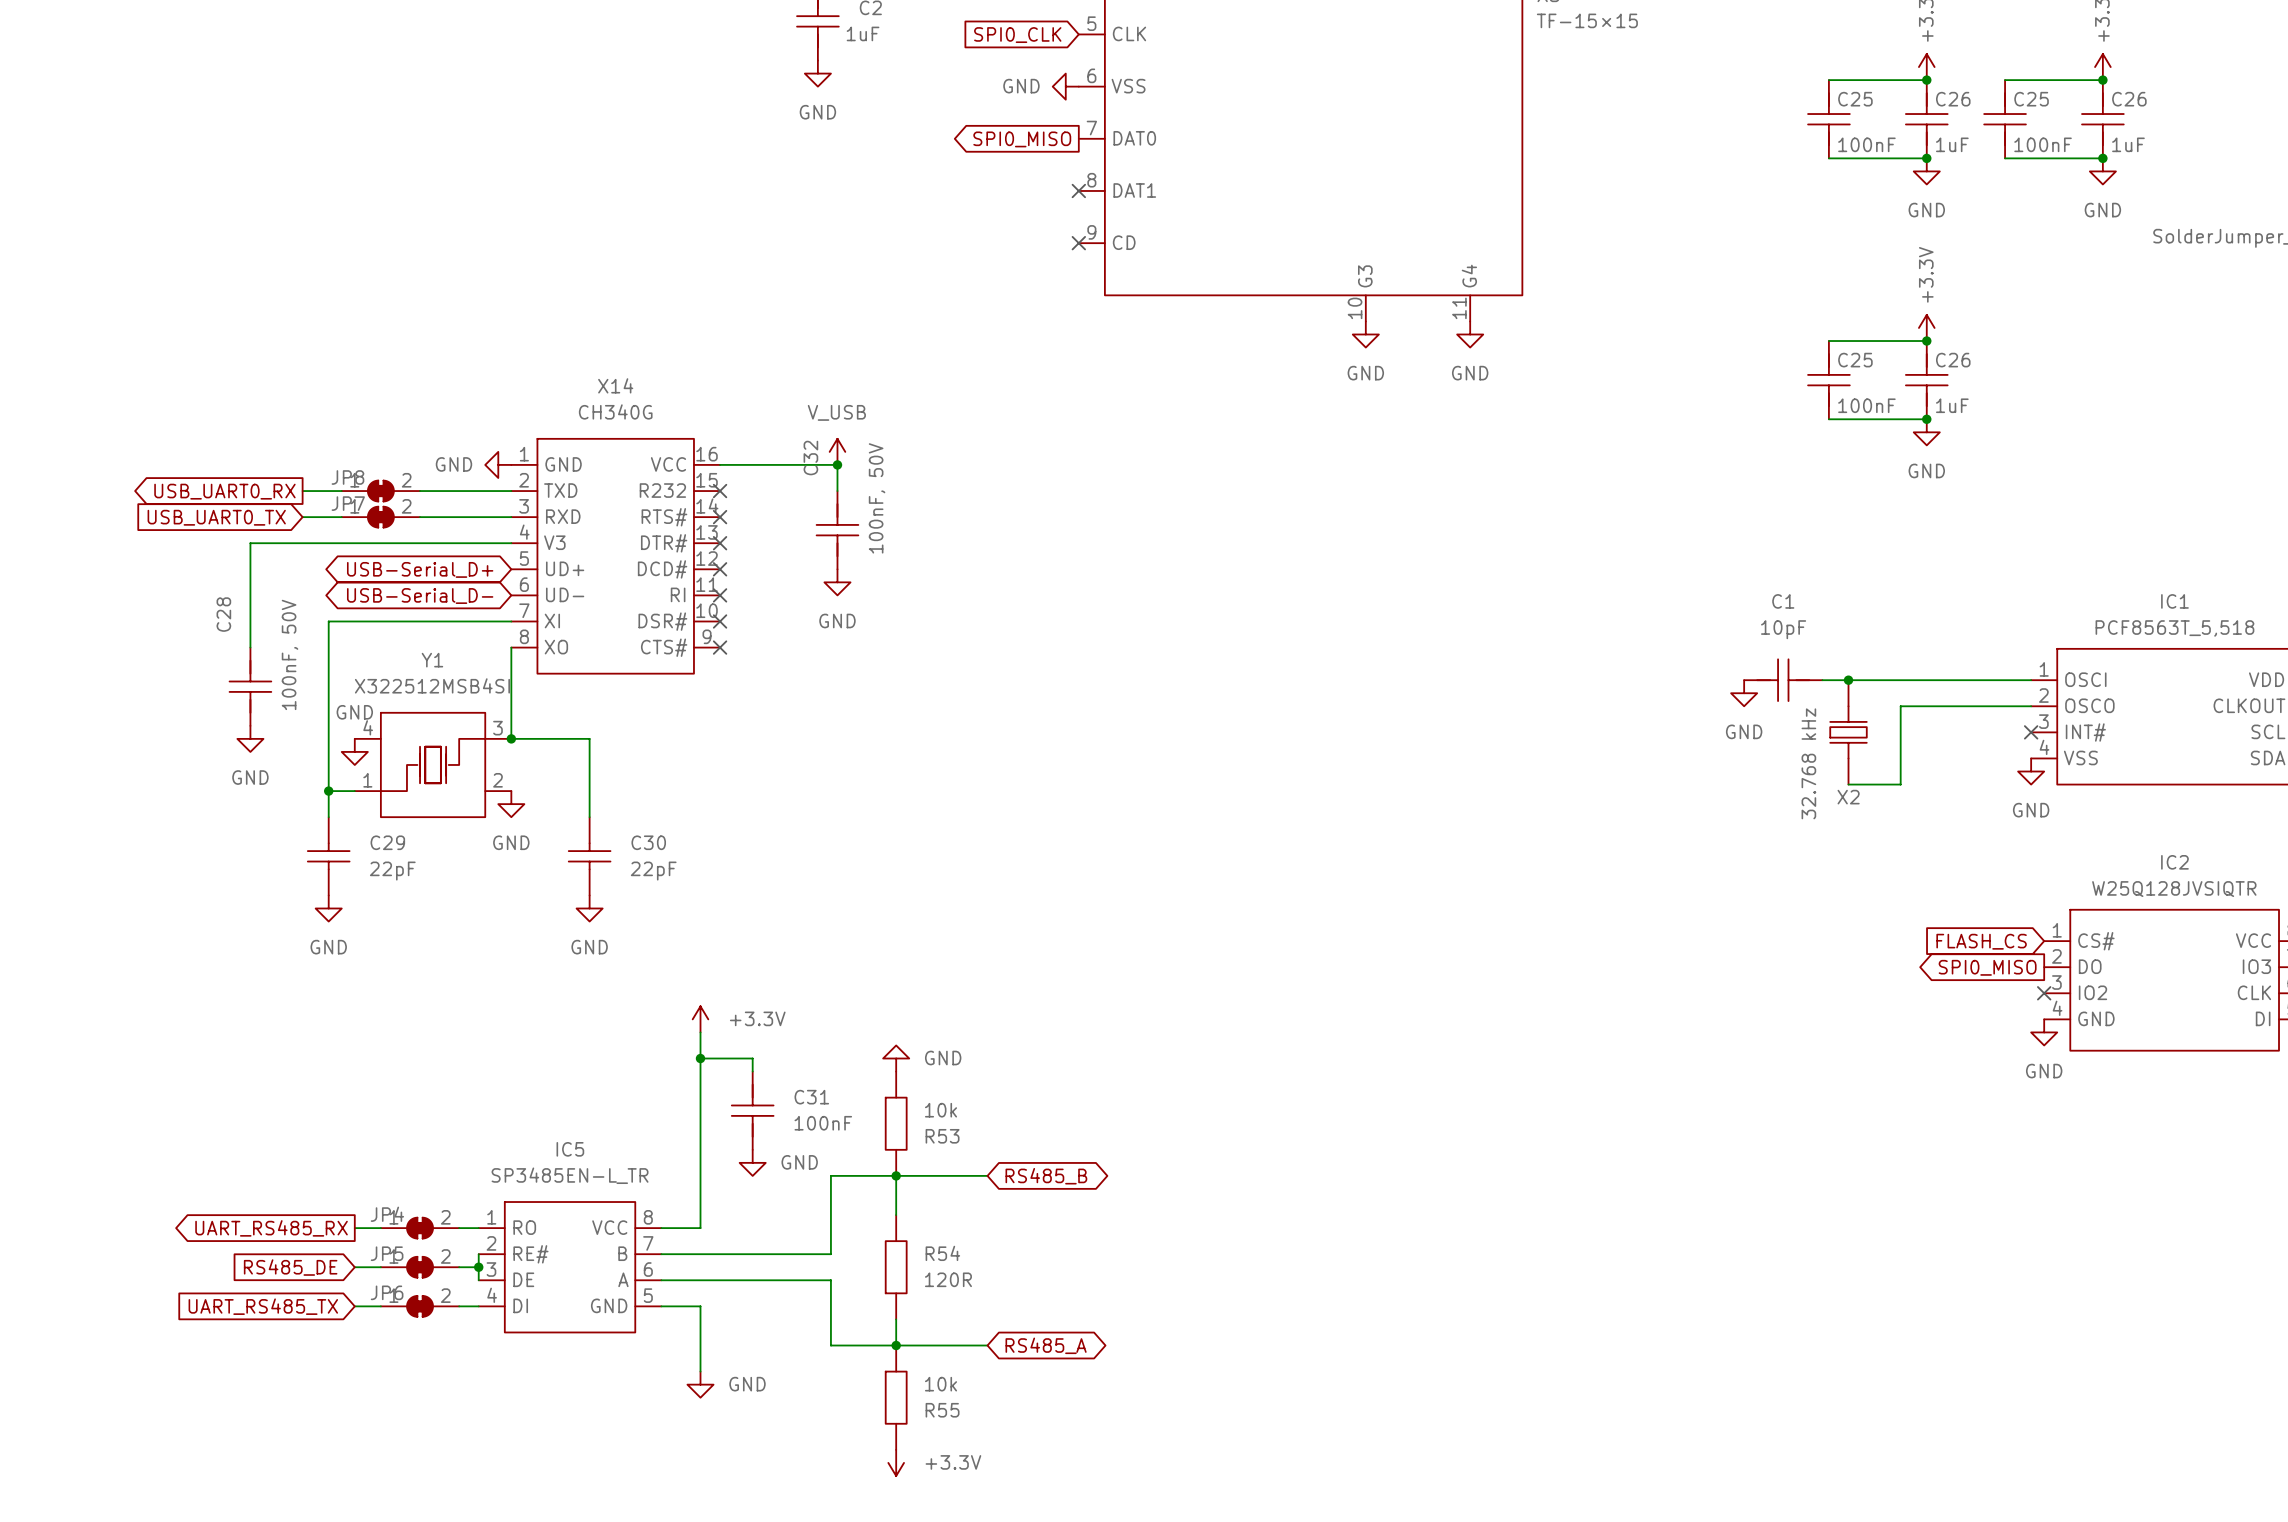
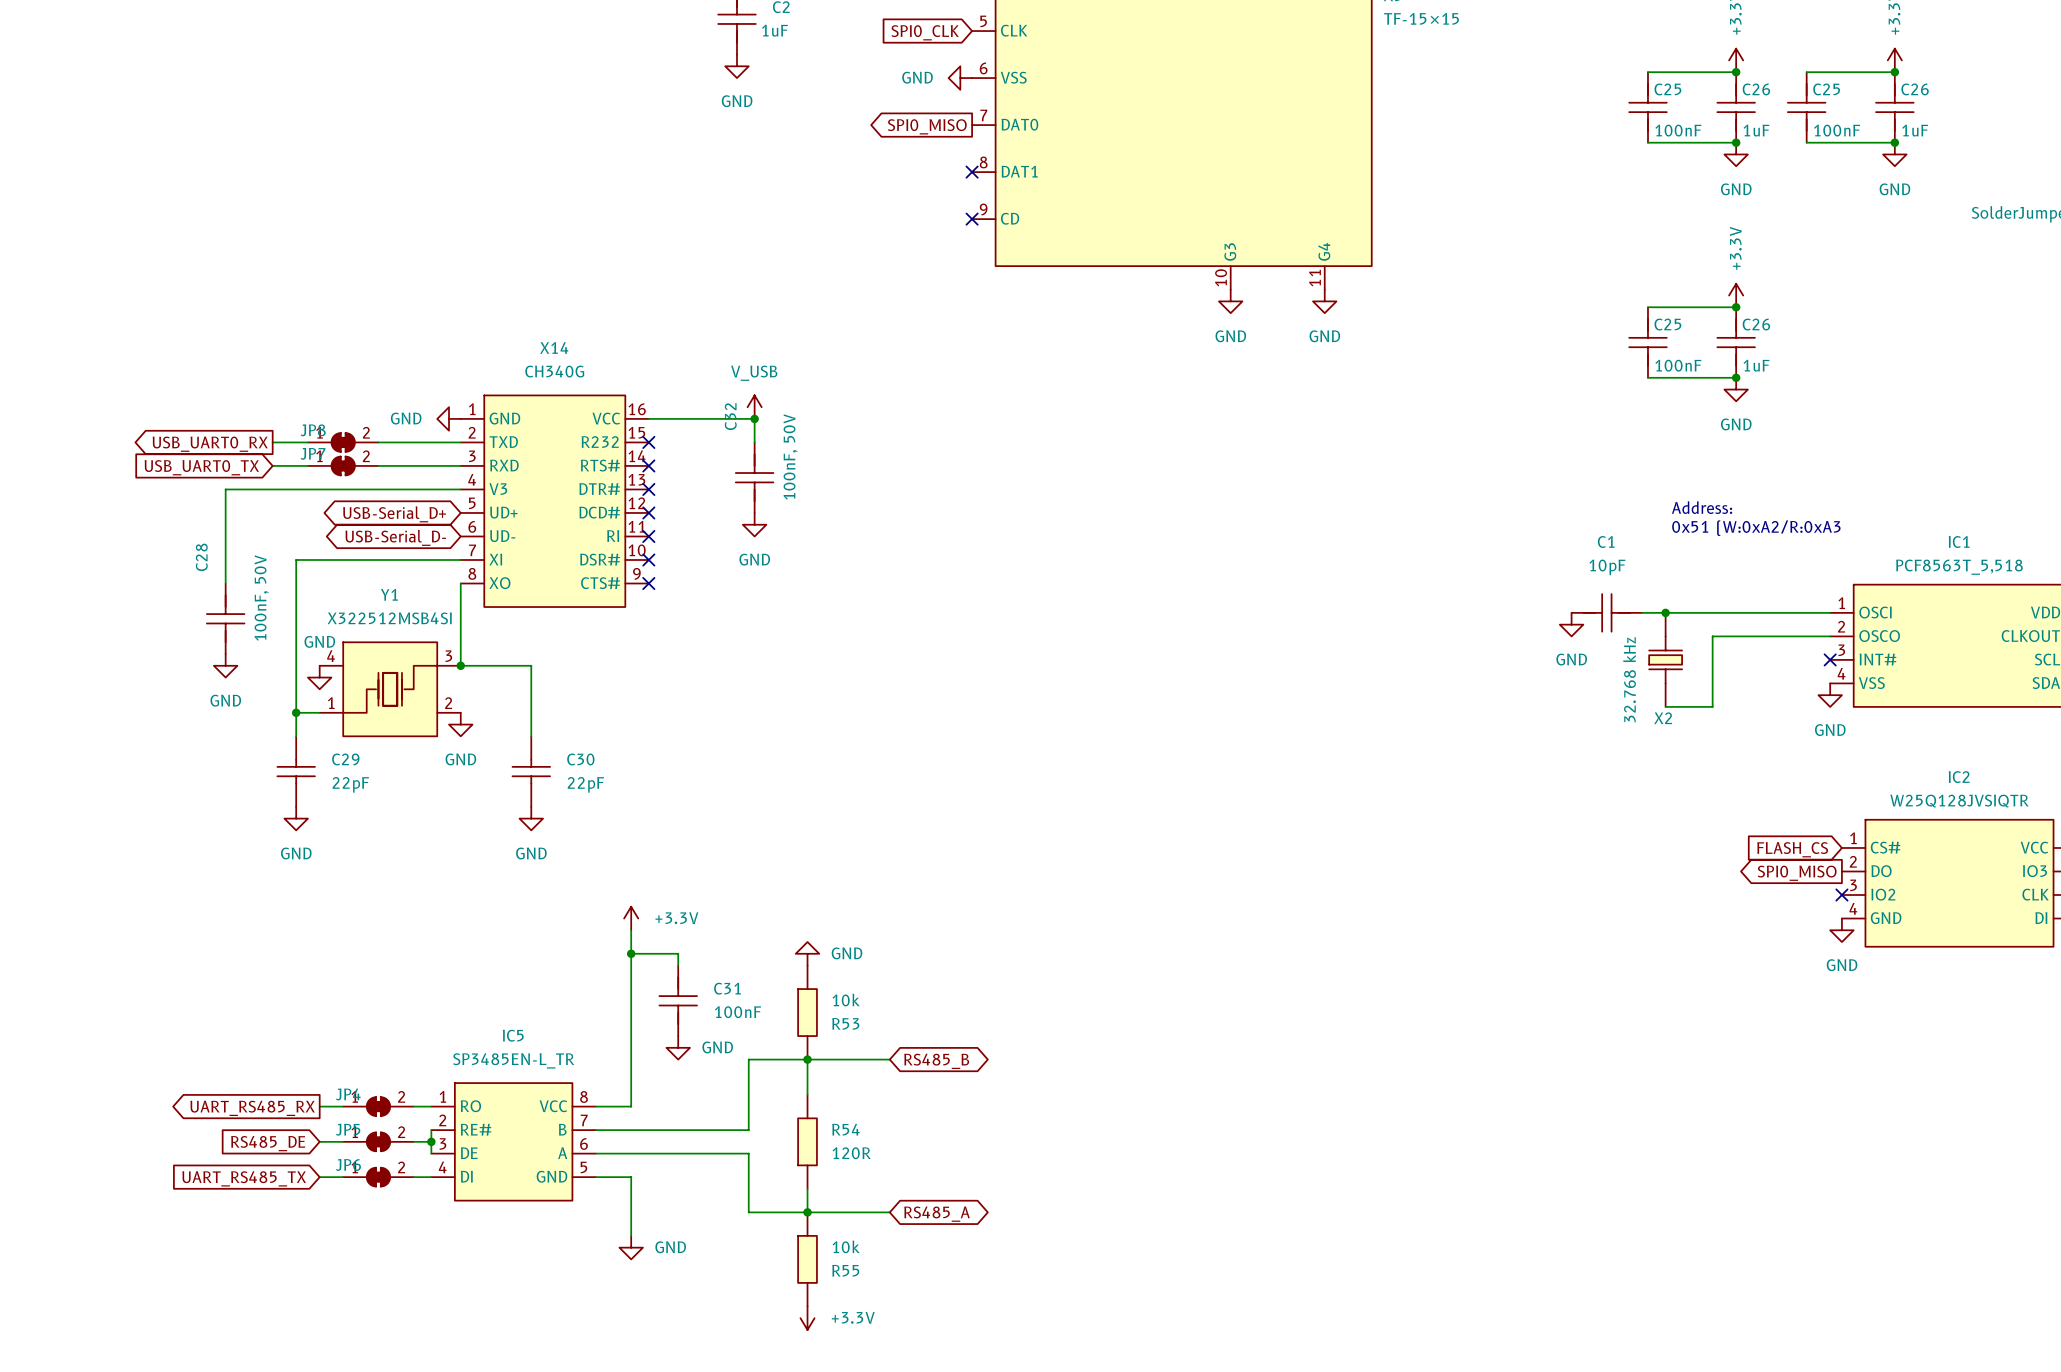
text: none -> Address: (1702, 507)
text: none -> 0x51 (W:0xA2/R:0xA3 (1756, 528)

